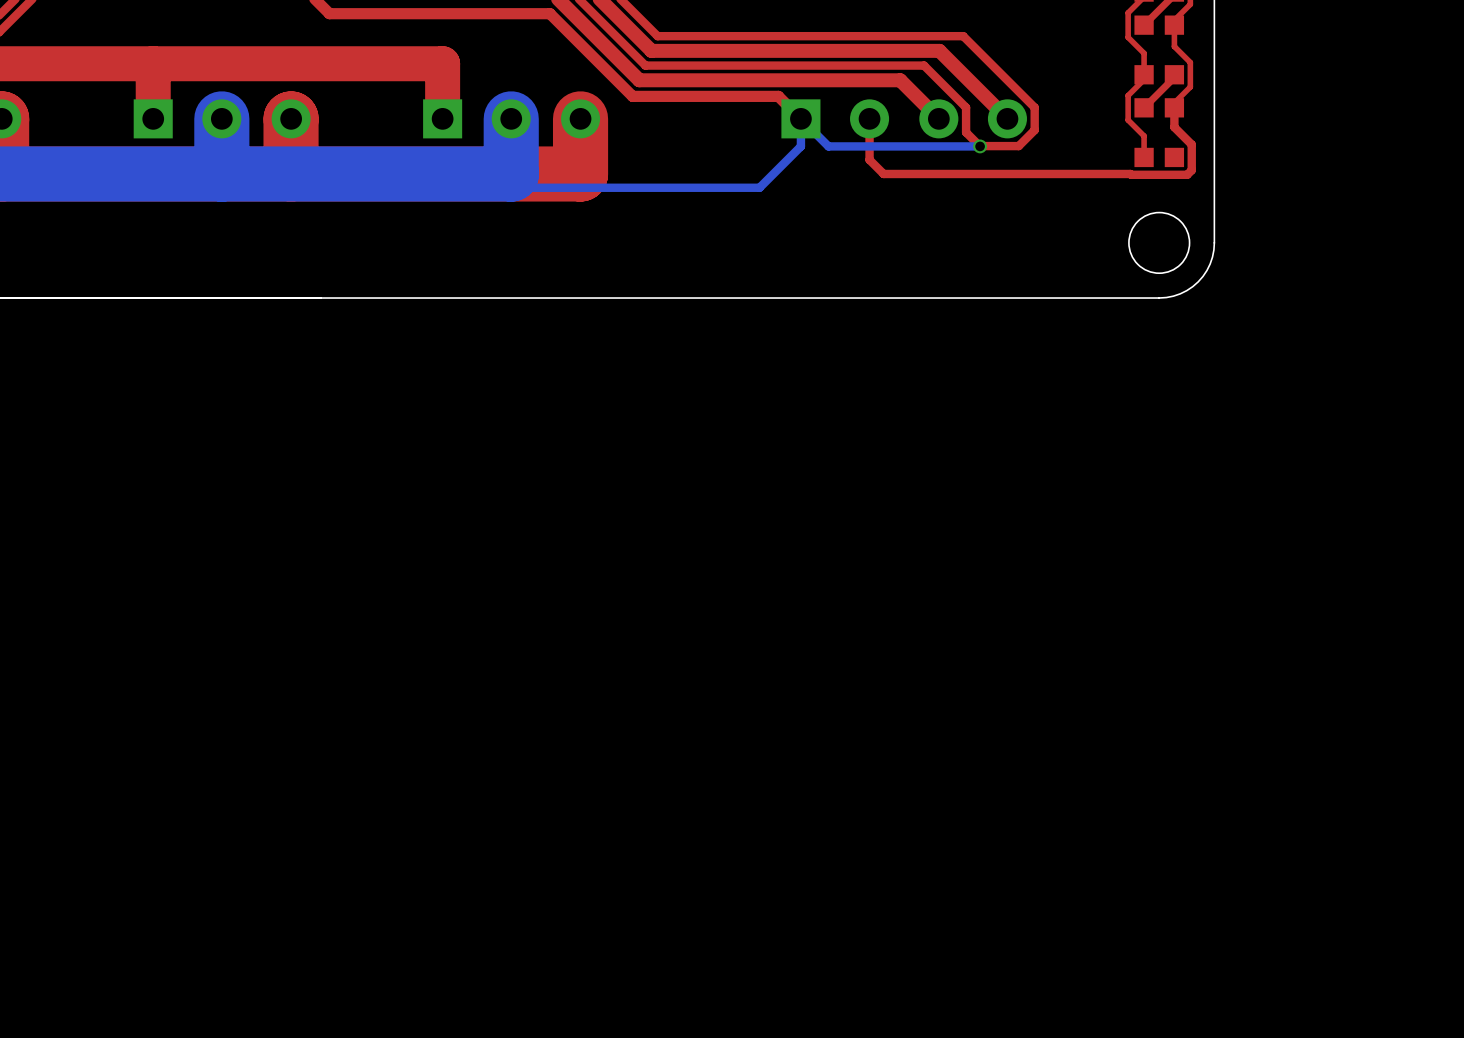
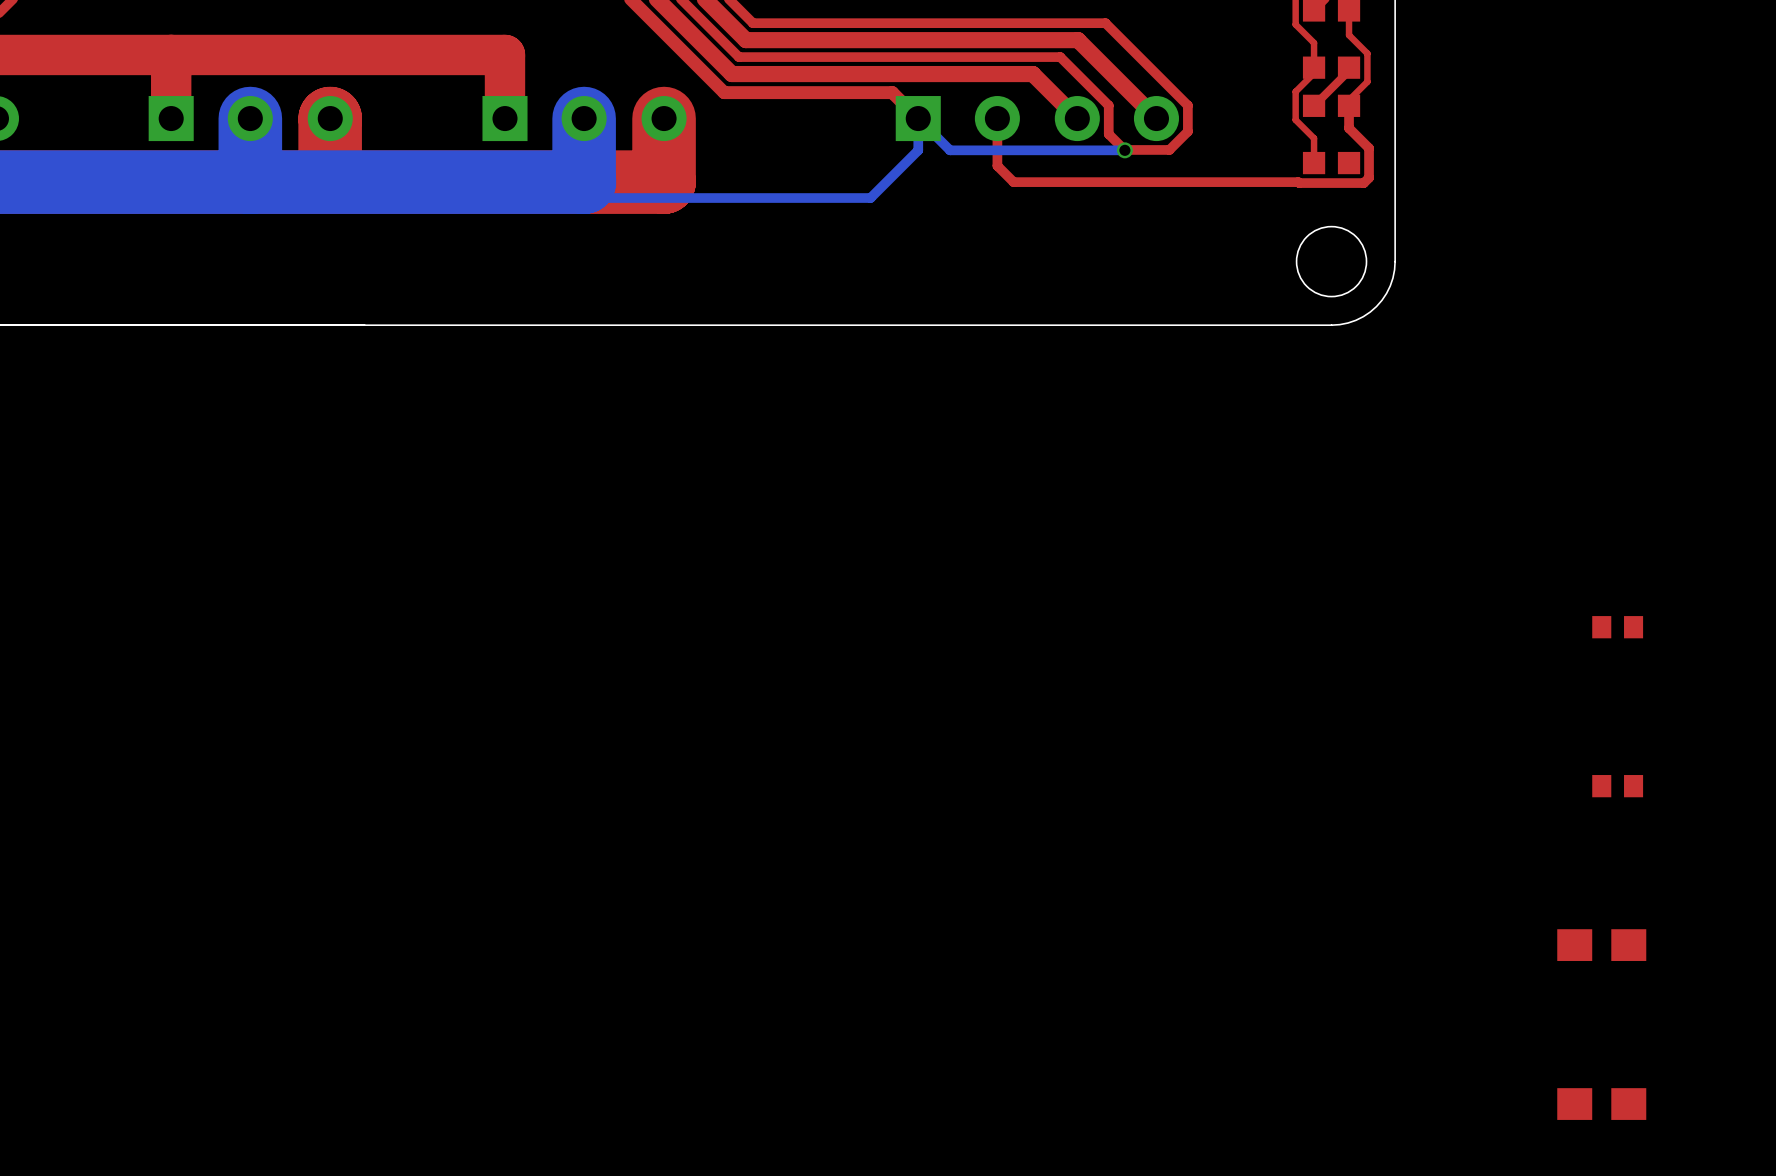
part: none -> (1617, 627)
part: none -> (1617, 786)
part: none -> (1601, 945)
part: none -> (1601, 1104)

